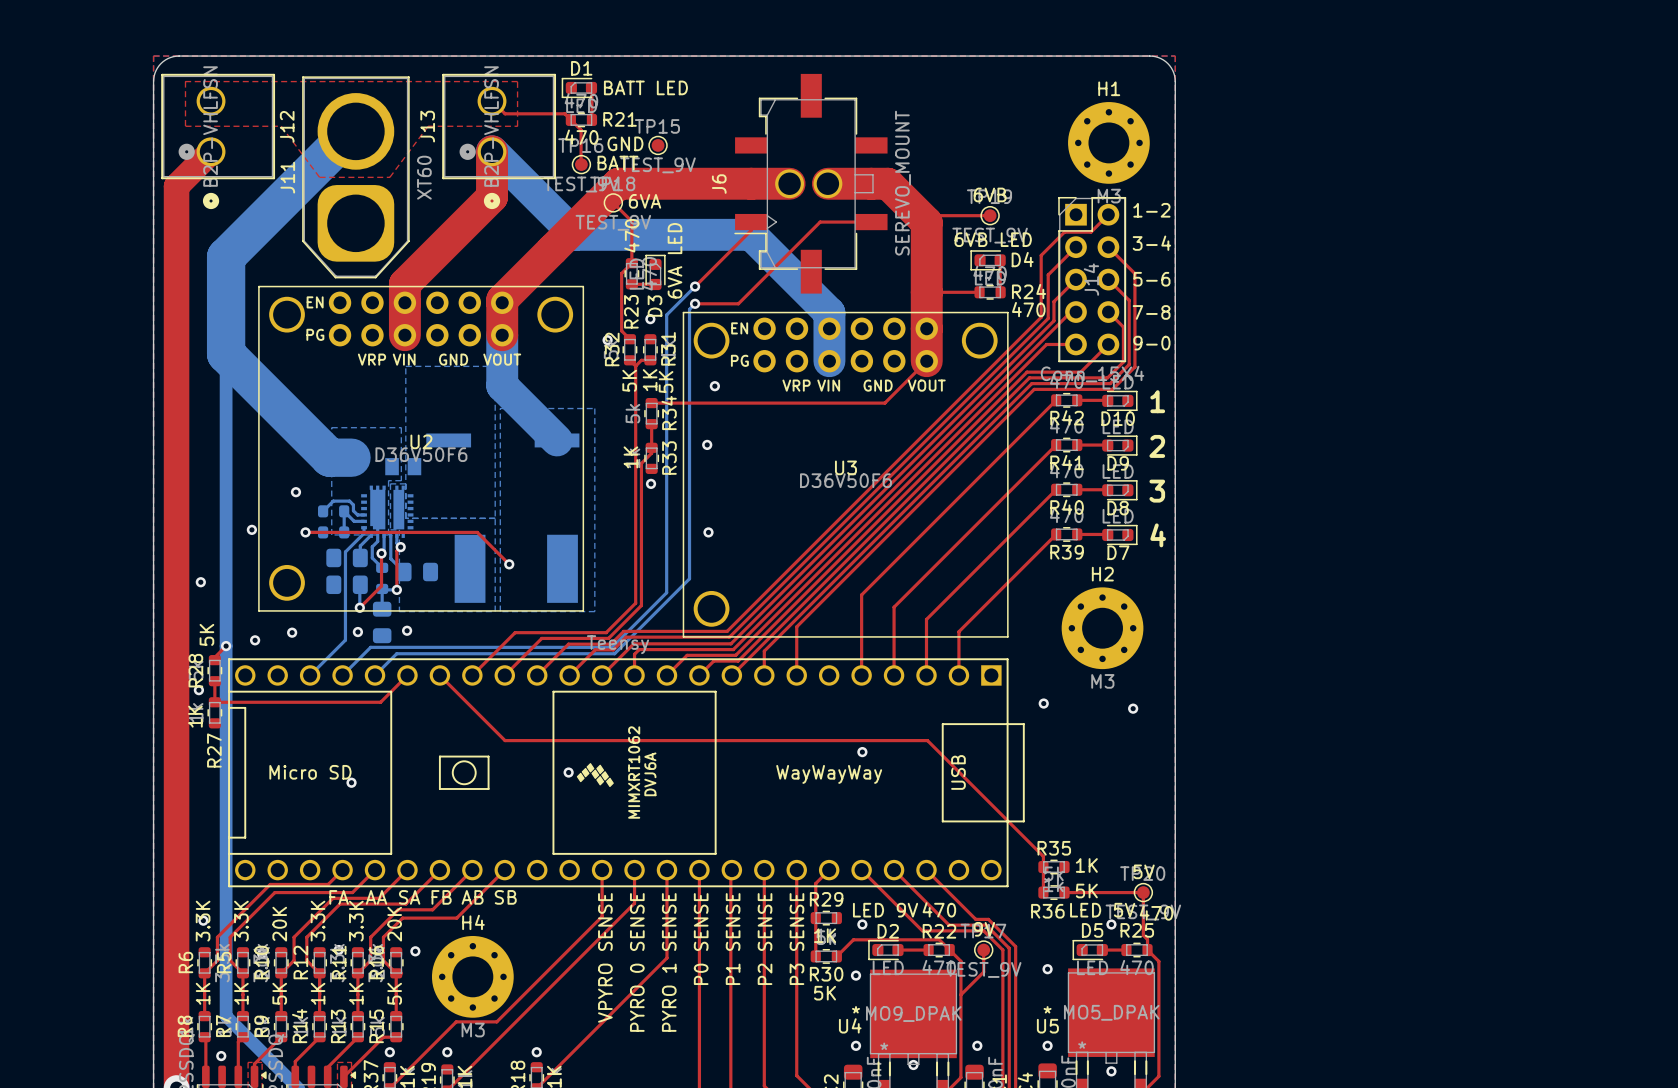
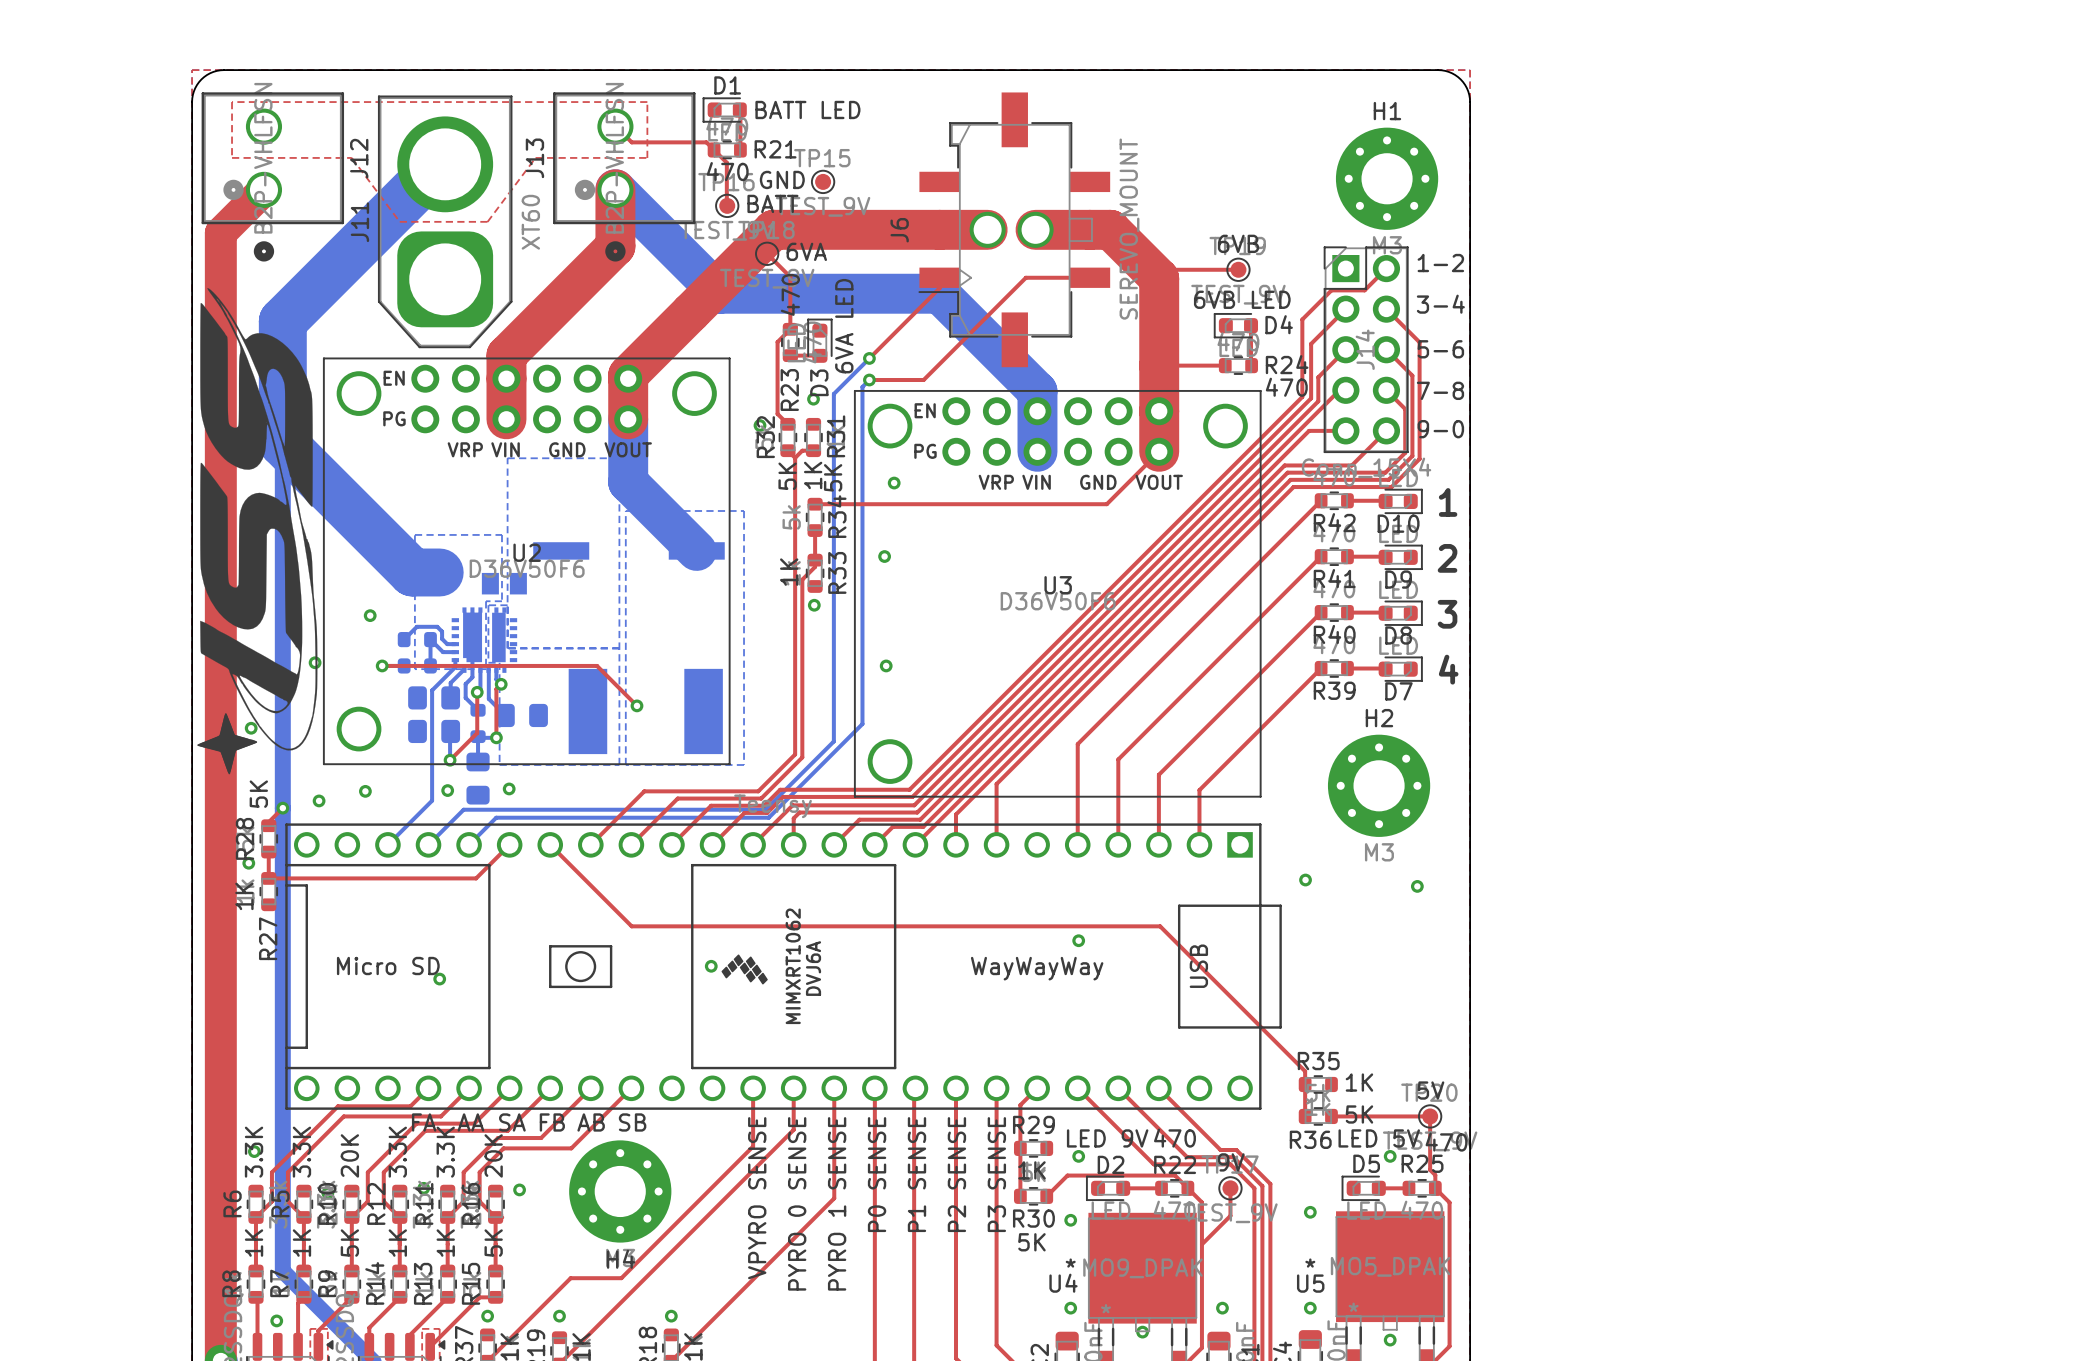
drawing: none -> [197, 288, 318, 775]
H4 name position: H4 (473, 922) -> H4 (621, 1259)
H4 position: (472, 976) -> (620, 1191)

